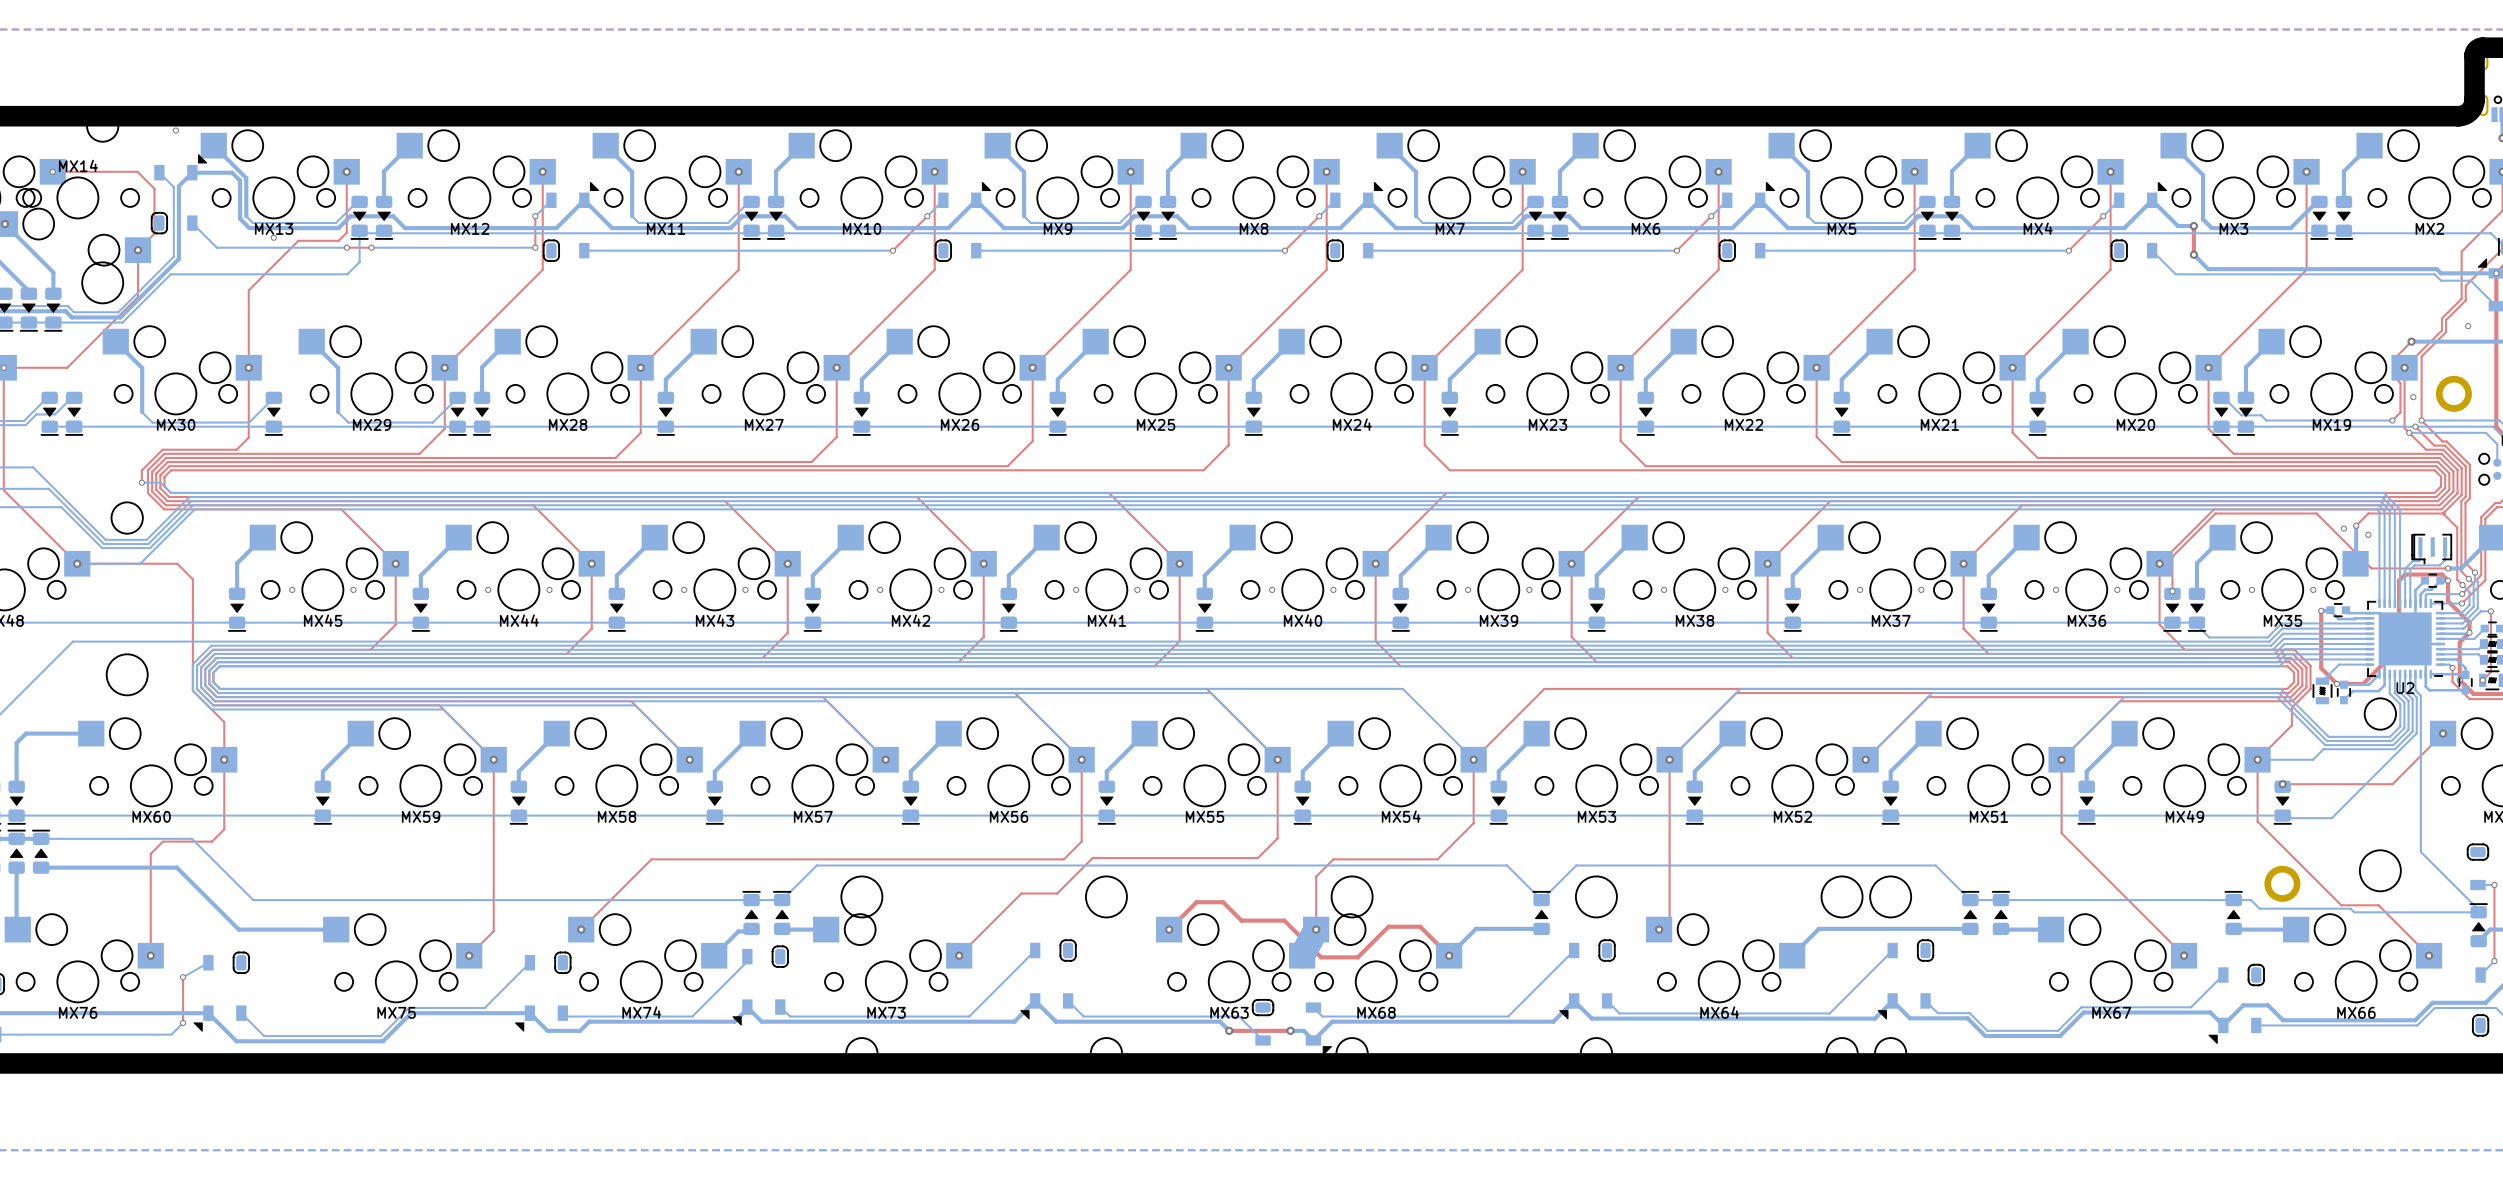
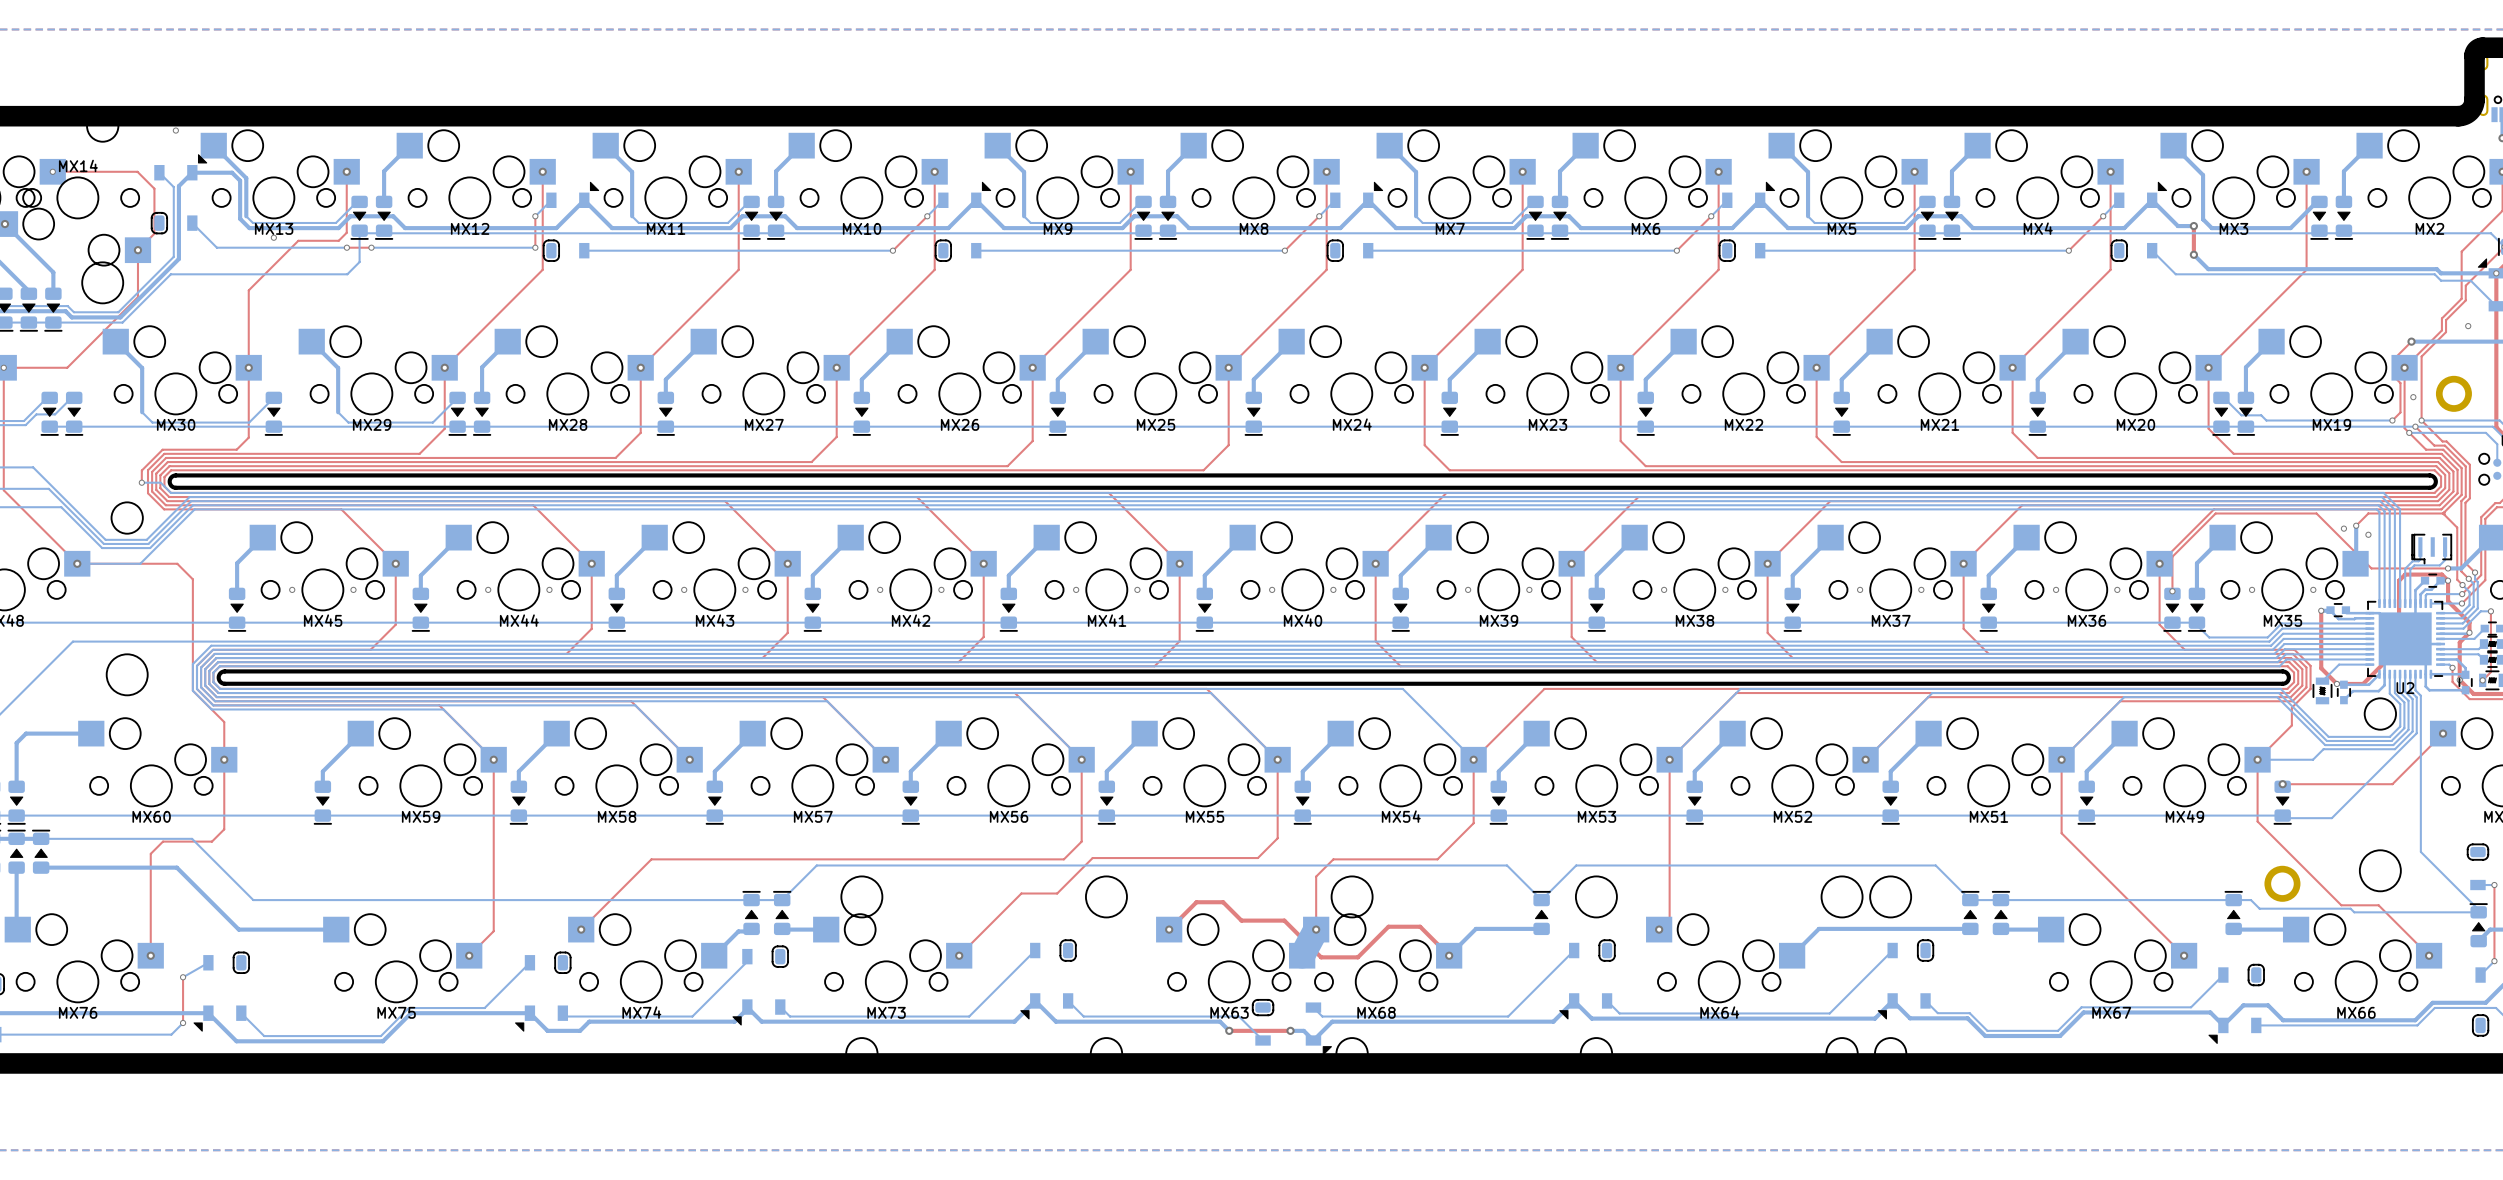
board edge: none -> (2429, 475) (175, 475) (171, 477) (169, 481) (171, 485) (175, 487) (2429, 487) (2434, 485) (2435, 481) (2434, 477) (2429, 475)
board edge: none -> (2282, 671) (224, 671) (220, 673) (218, 677) (220, 681) (224, 683) (2282, 683) (2287, 681) (2288, 677) (2287, 673) (2282, 671)

